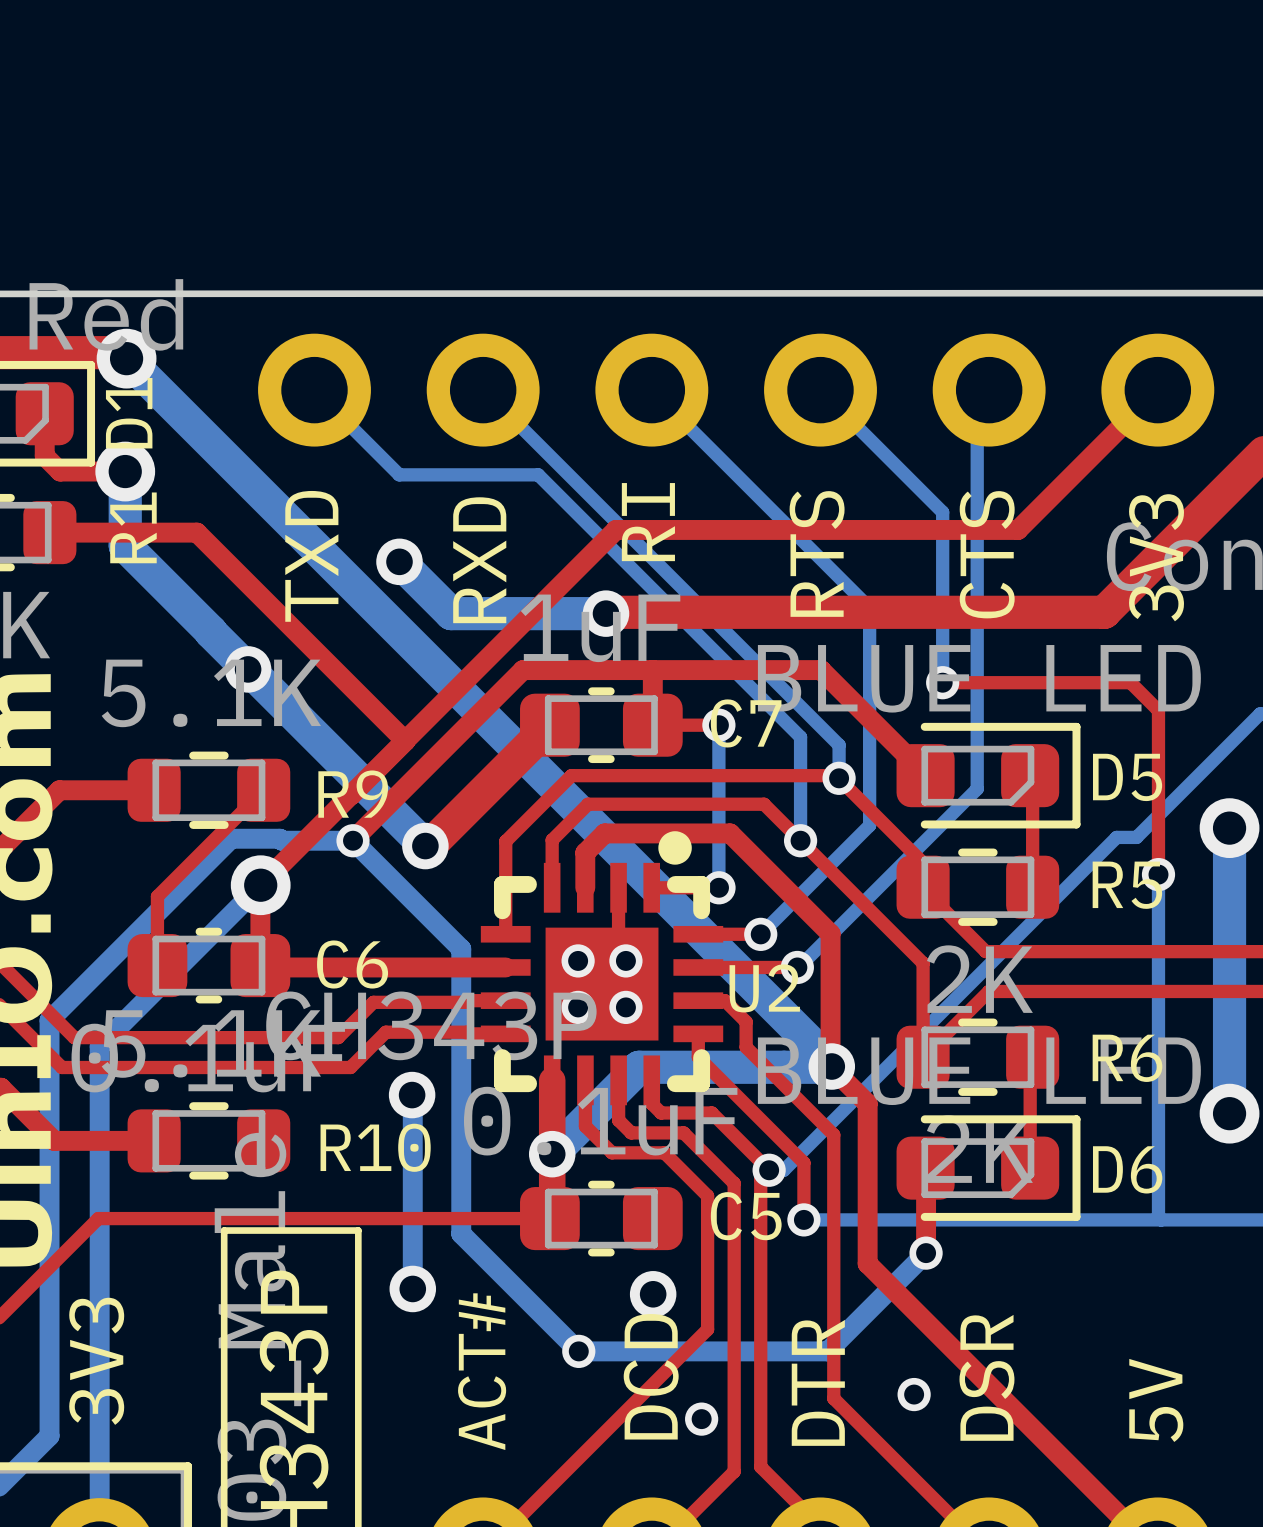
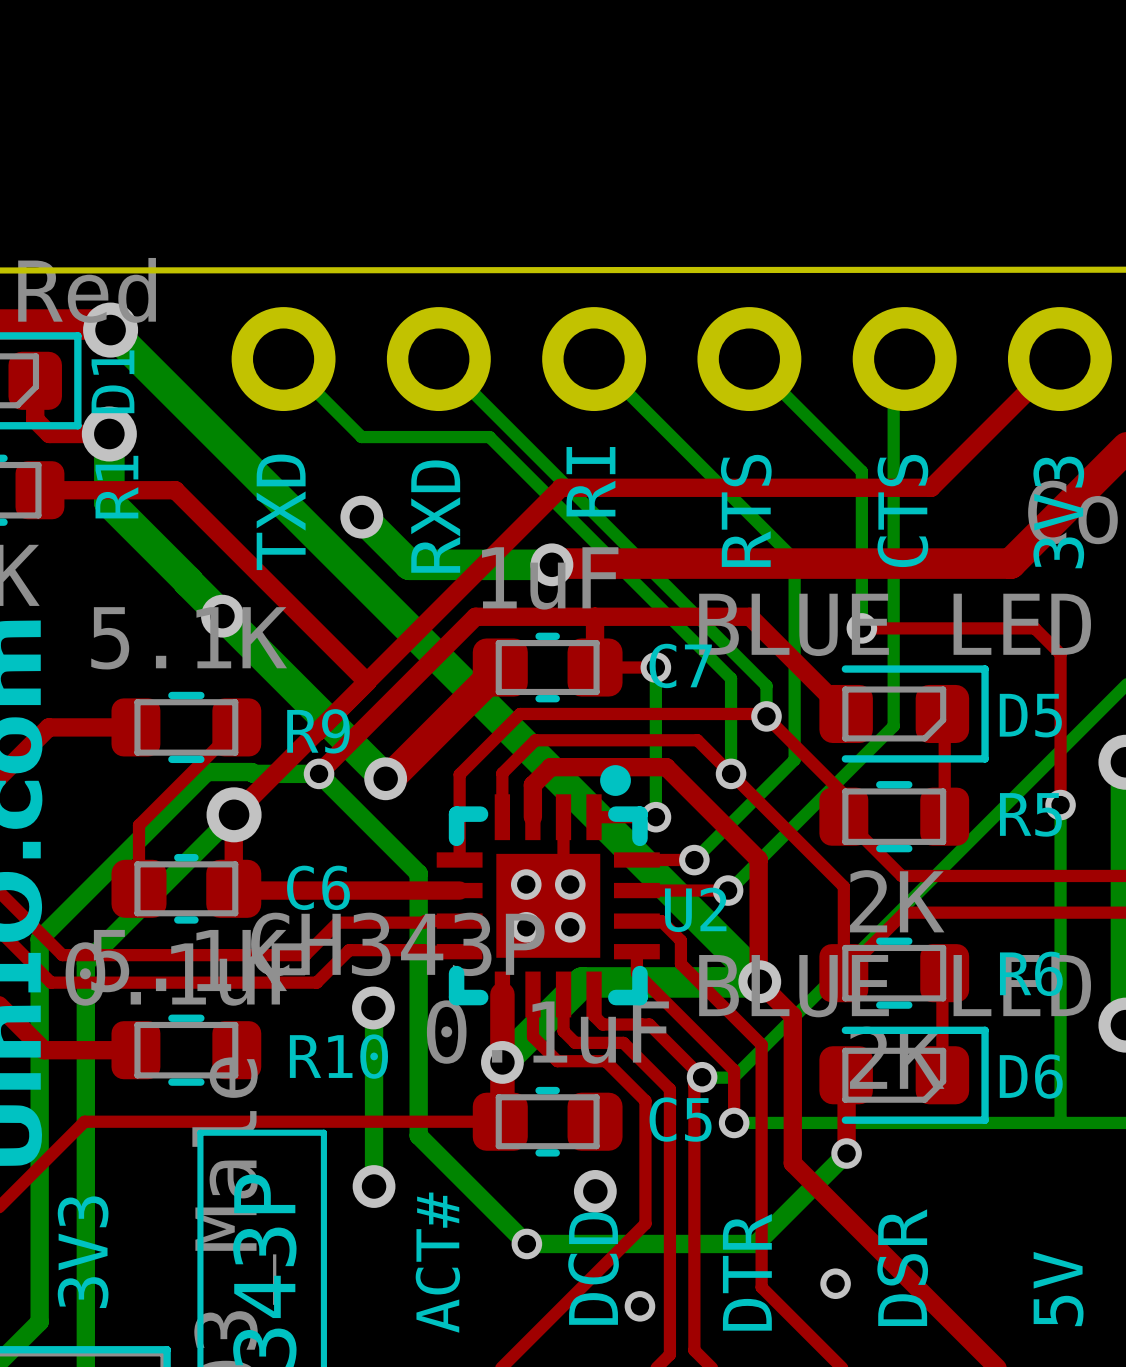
bottom track: (1136, 837) (1116, 837) (783, 1170) (769, 1170) -> (1040, 770) (733, 1077) (694, 1077)

